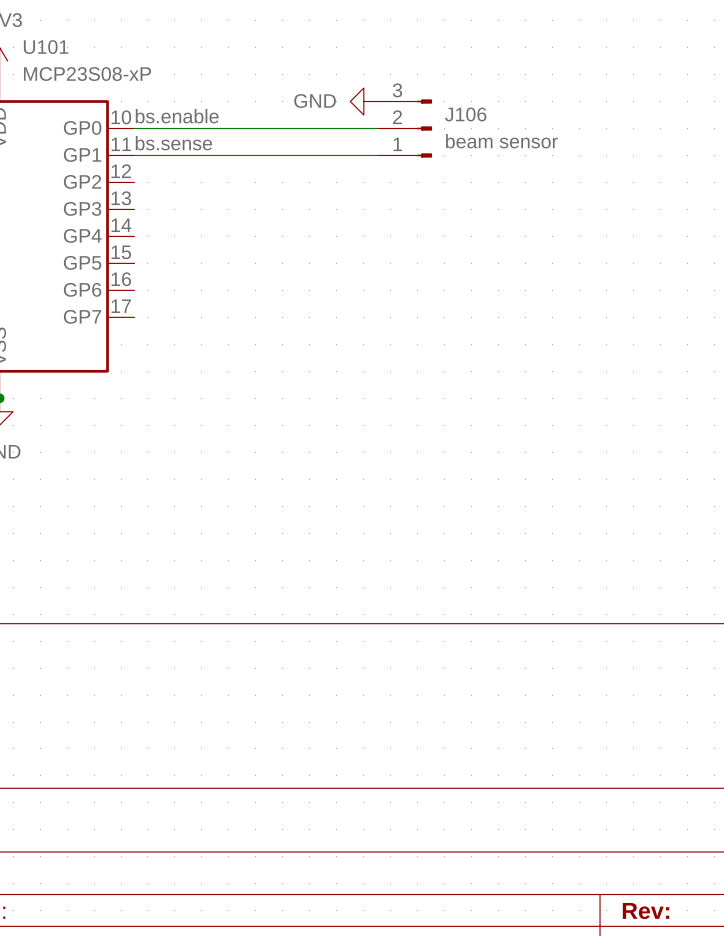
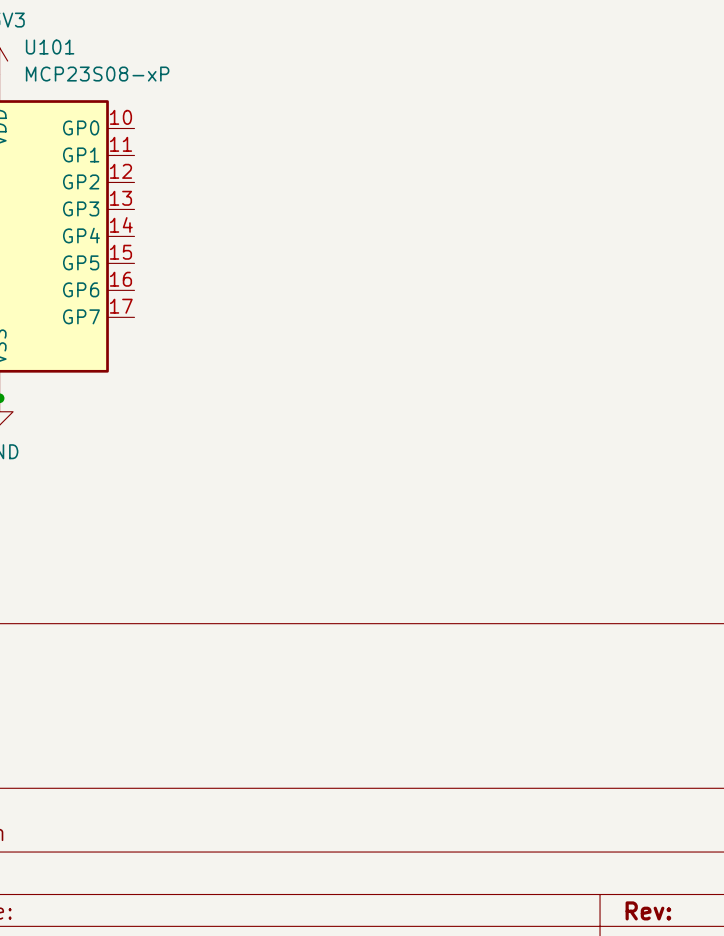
power symbol: GND (363, 101) -> none
label: bs.enable (177, 116) -> none
wire: (134, 128) (377, 128) -> none
J106: beam sensor (404, 128) -> none
label: bs.sense (173, 143) -> none
wire: (134, 155) (377, 155) -> none

